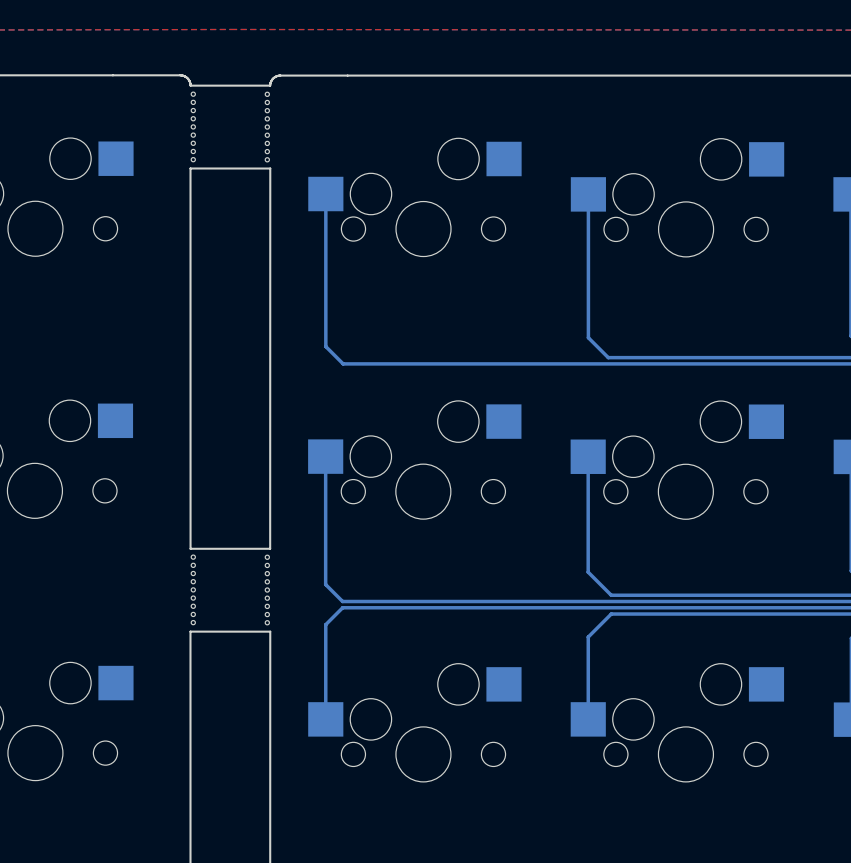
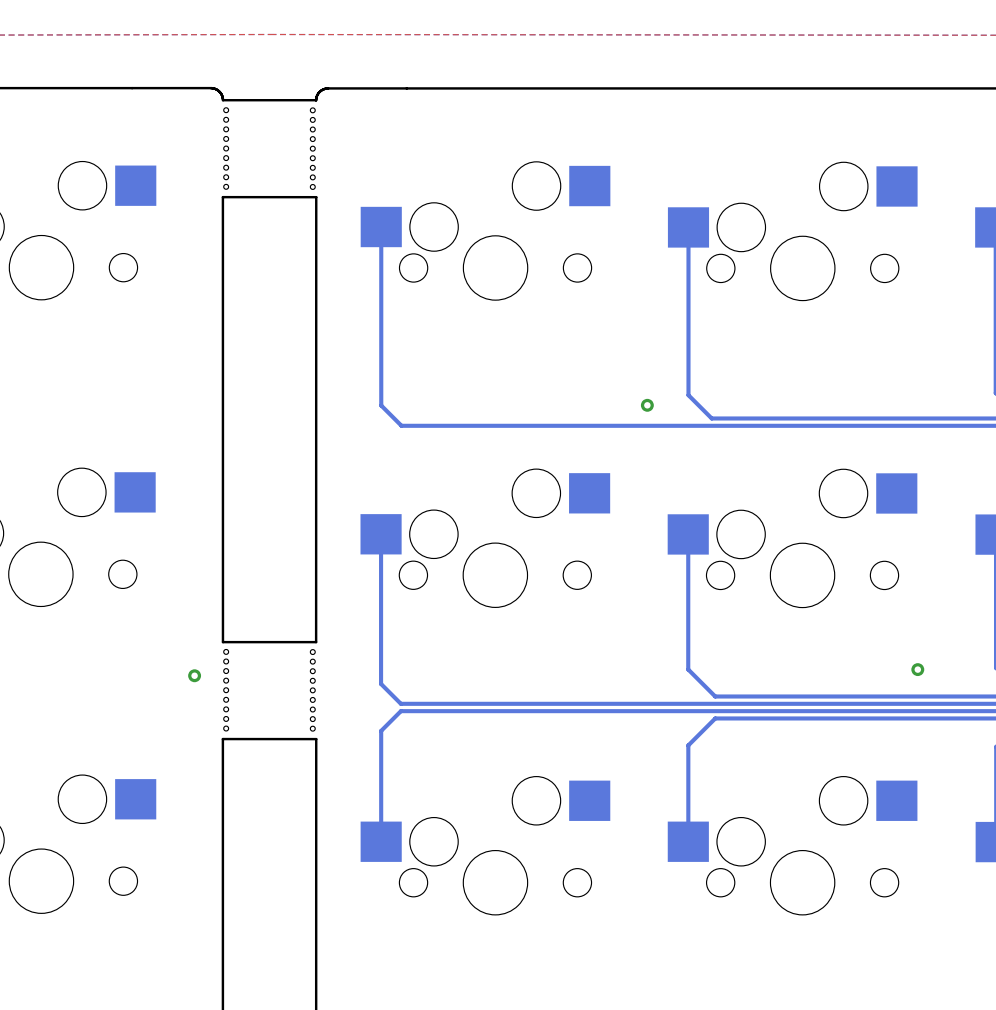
via: none -> (647, 405)
via: none -> (917, 669)
via: none -> (194, 675)

